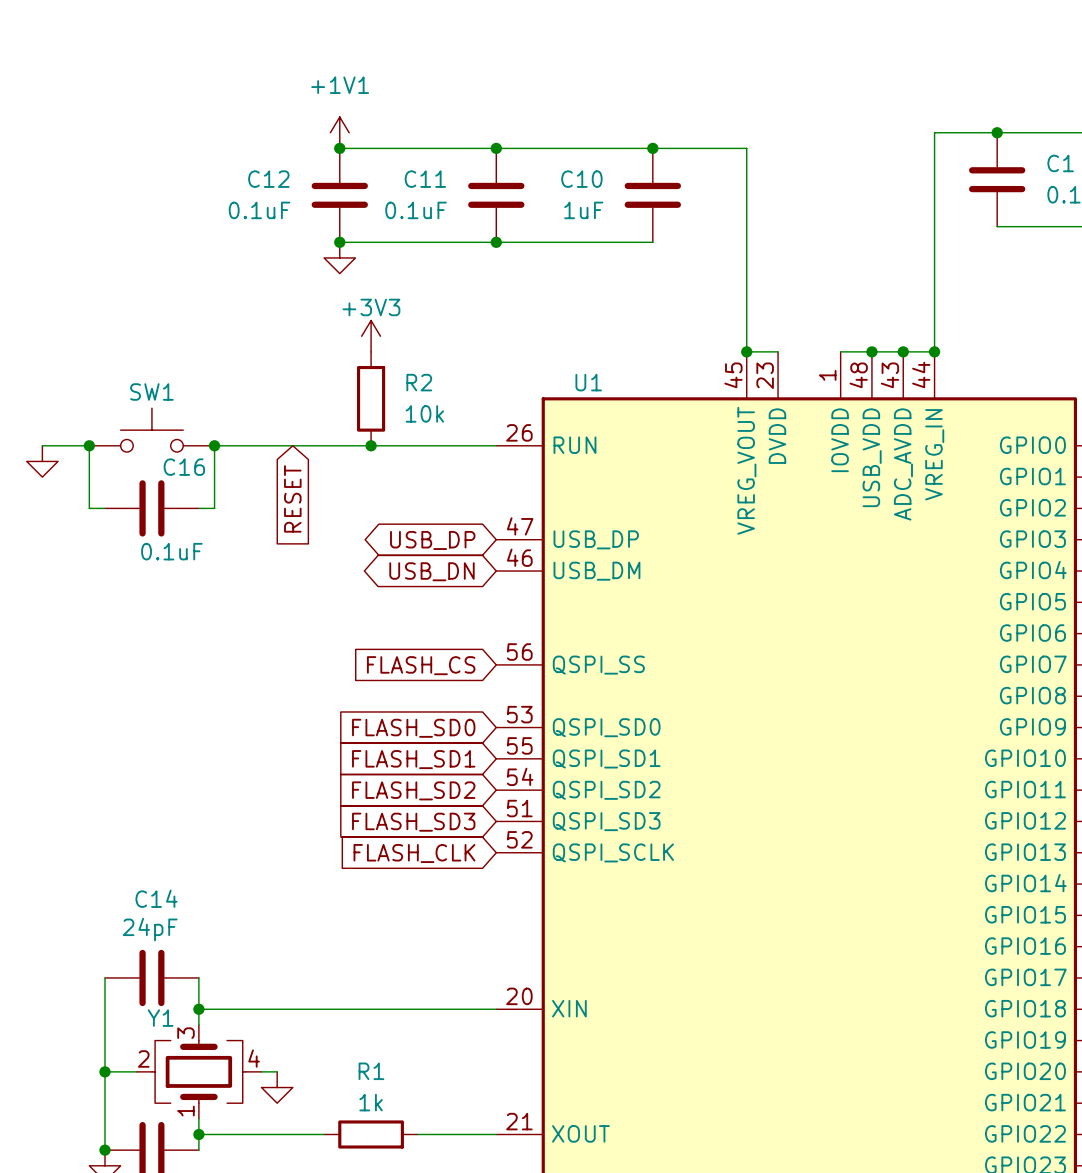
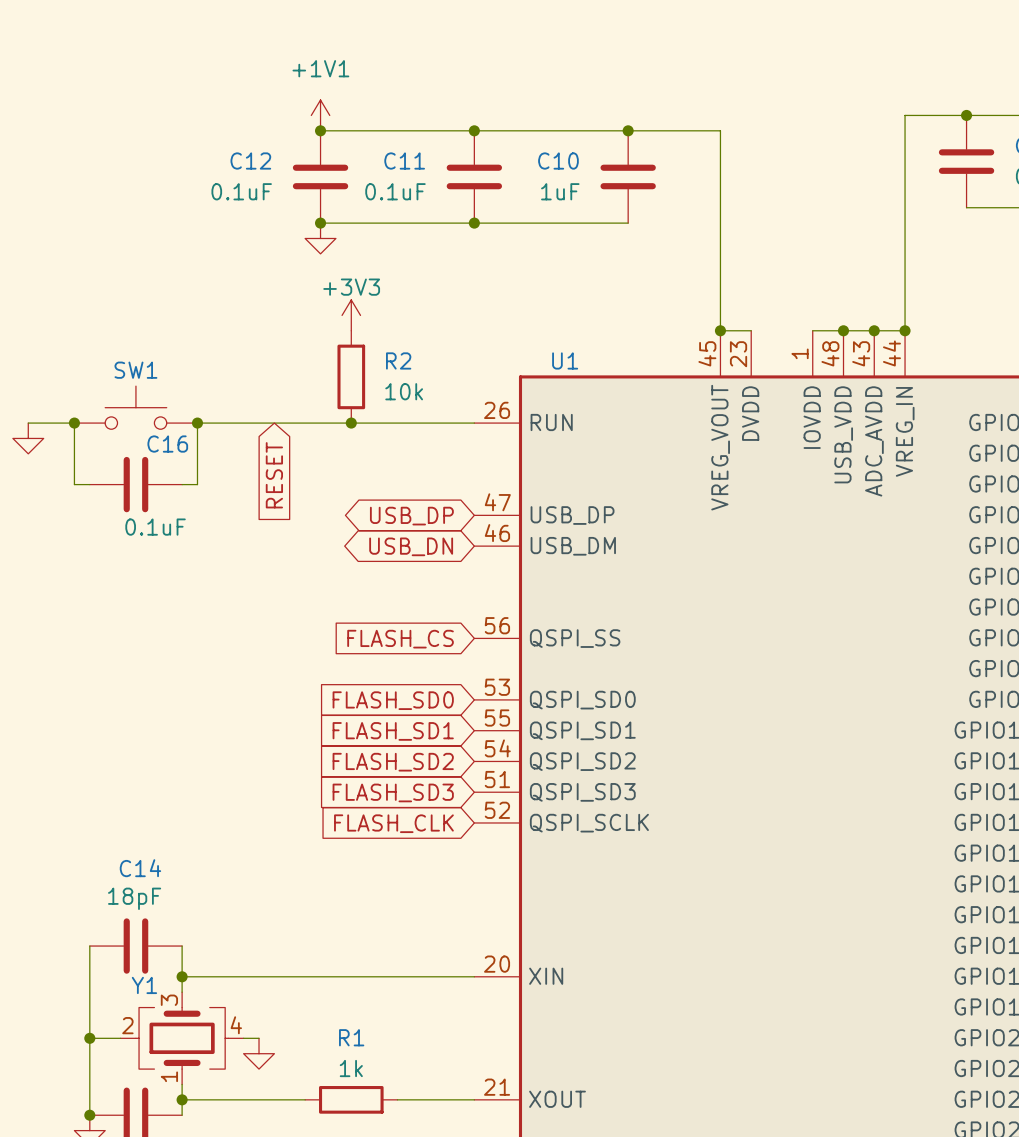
C14 value: 24pF (150, 929) -> 18pF (134, 898)

